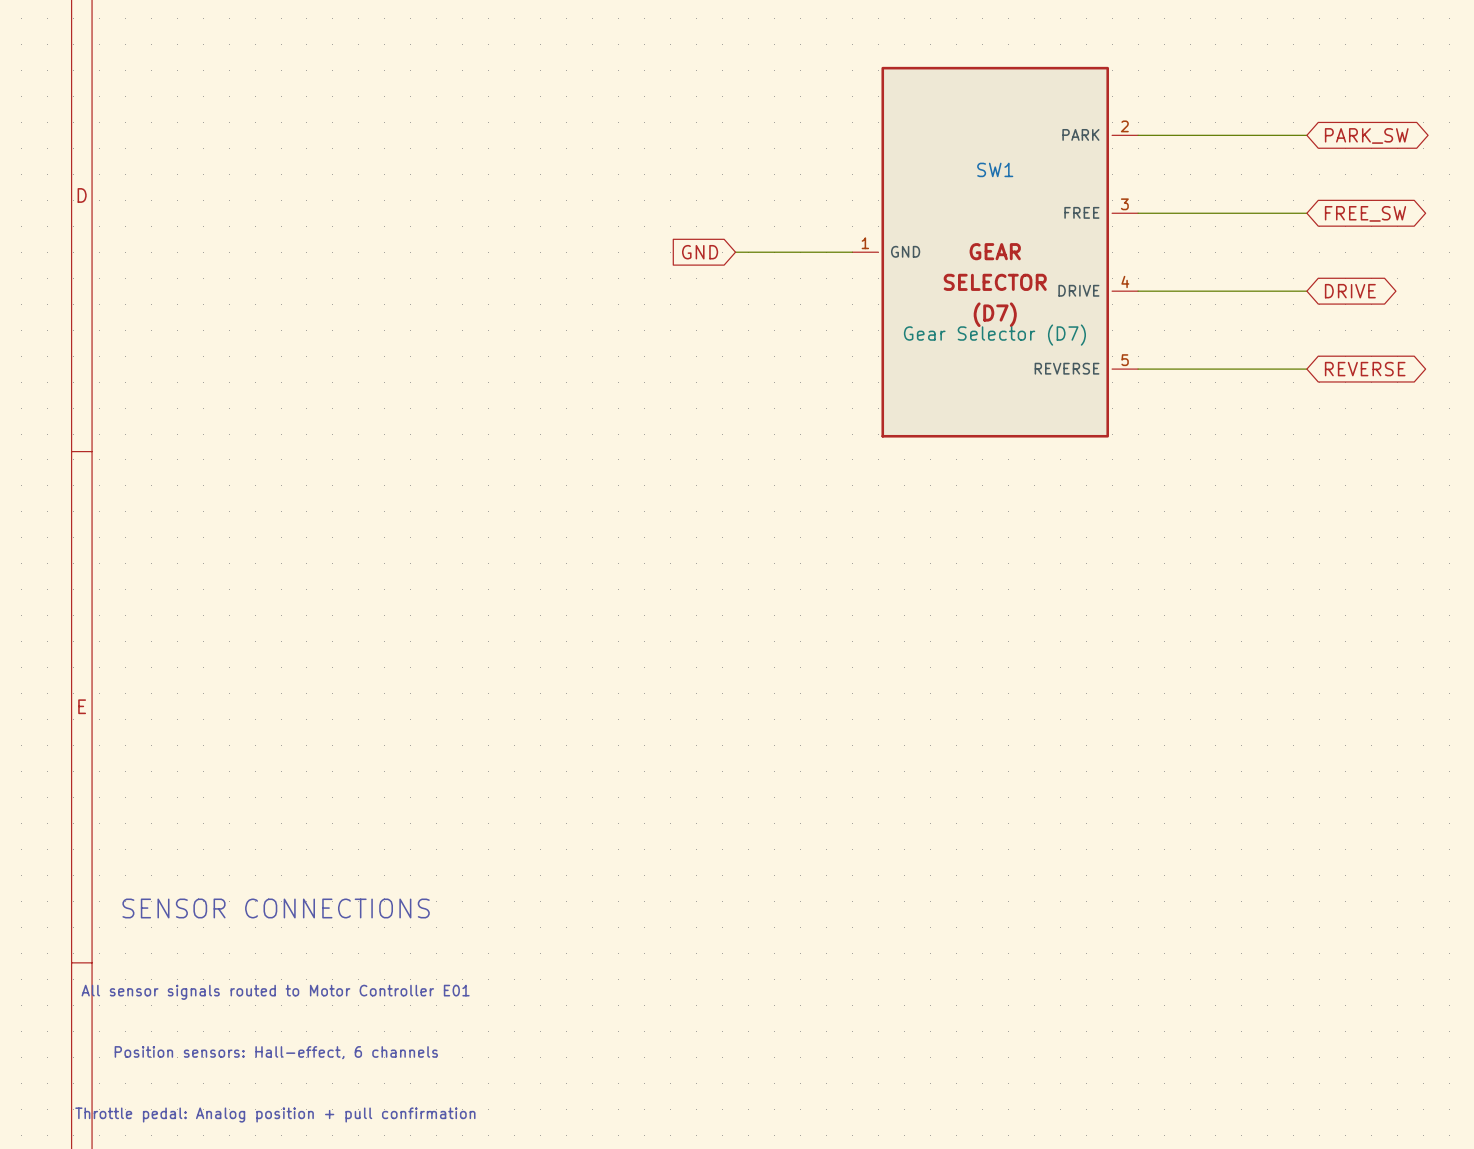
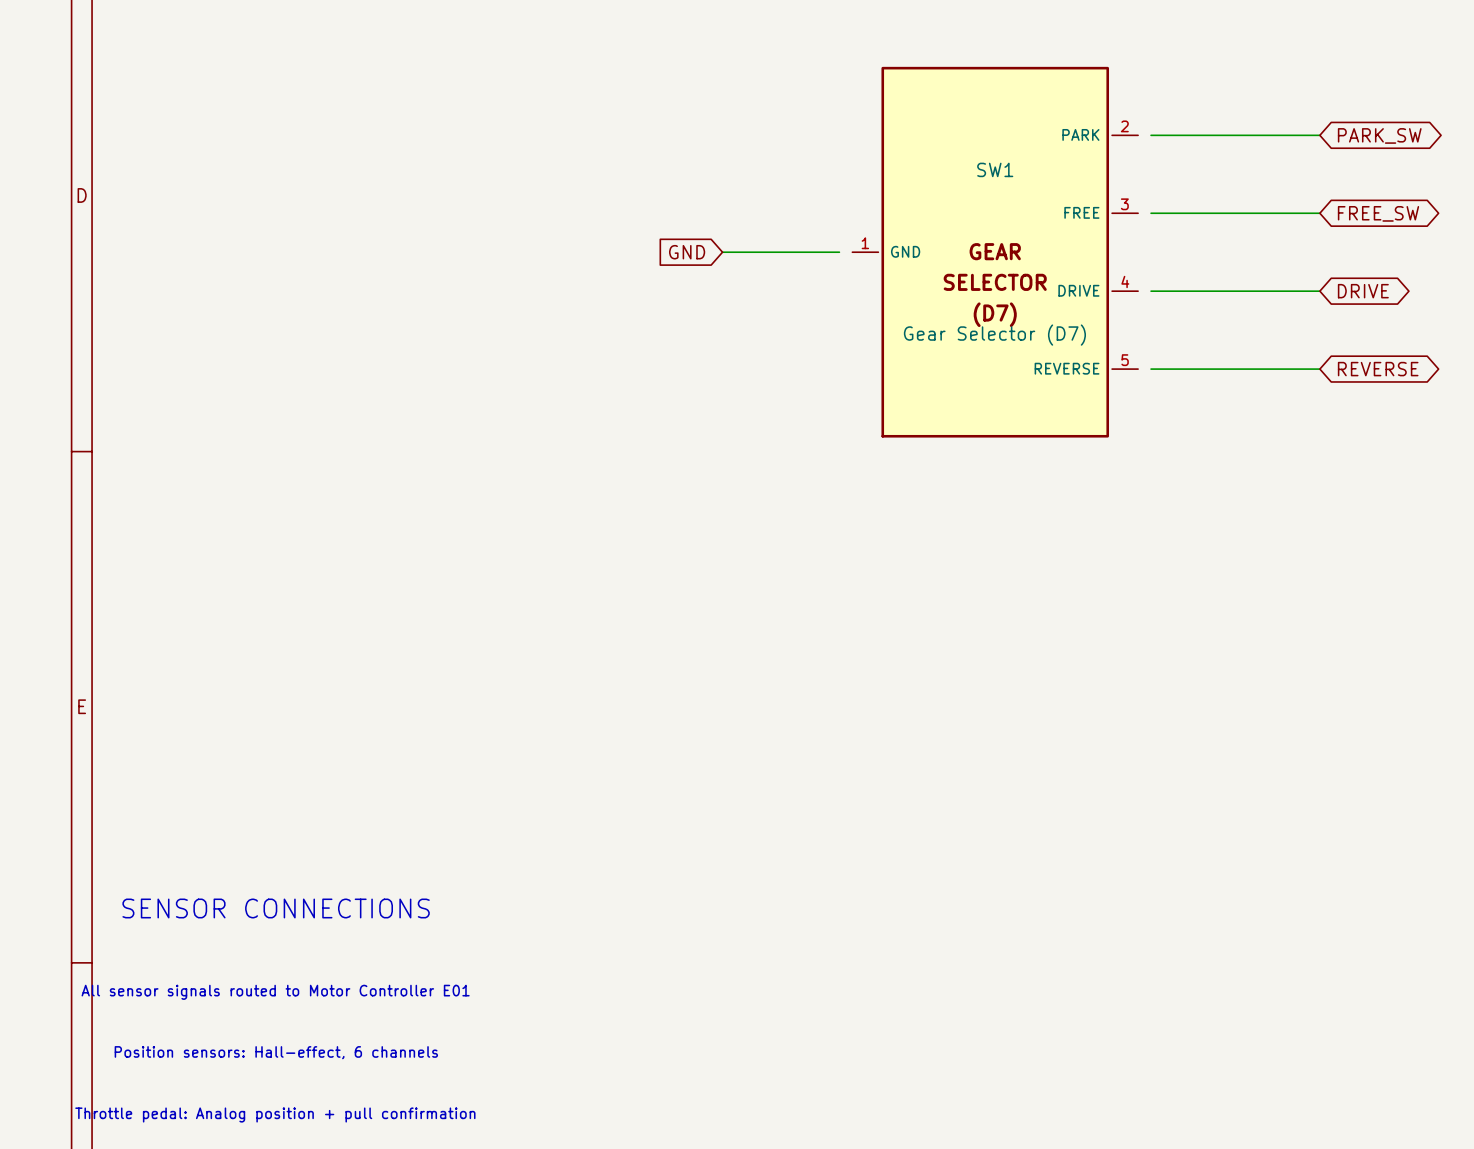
wire: (1138, 135) (1151, 135) -> (1306, 135) (1319, 135)
global label position: PARK_SW (1366, 135) -> PARK_SW (1379, 135)
wire: (1138, 213) (1151, 213) -> (1306, 213) (1319, 213)
global label position: FREE_SW (1365, 213) -> FREE_SW (1378, 213)
global label position: GND (700, 252) -> GND (687, 252)
wire: (839, 252) (852, 252) -> (722, 252) (735, 252)
wire: (1138, 291) (1151, 291) -> (1306, 291) (1319, 291)
global label position: DRIVE (1350, 291) -> DRIVE (1363, 291)
wire: (1138, 369) (1151, 369) -> (1306, 369) (1319, 369)
global label position: REVERSE (1365, 369) -> REVERSE (1378, 369)

